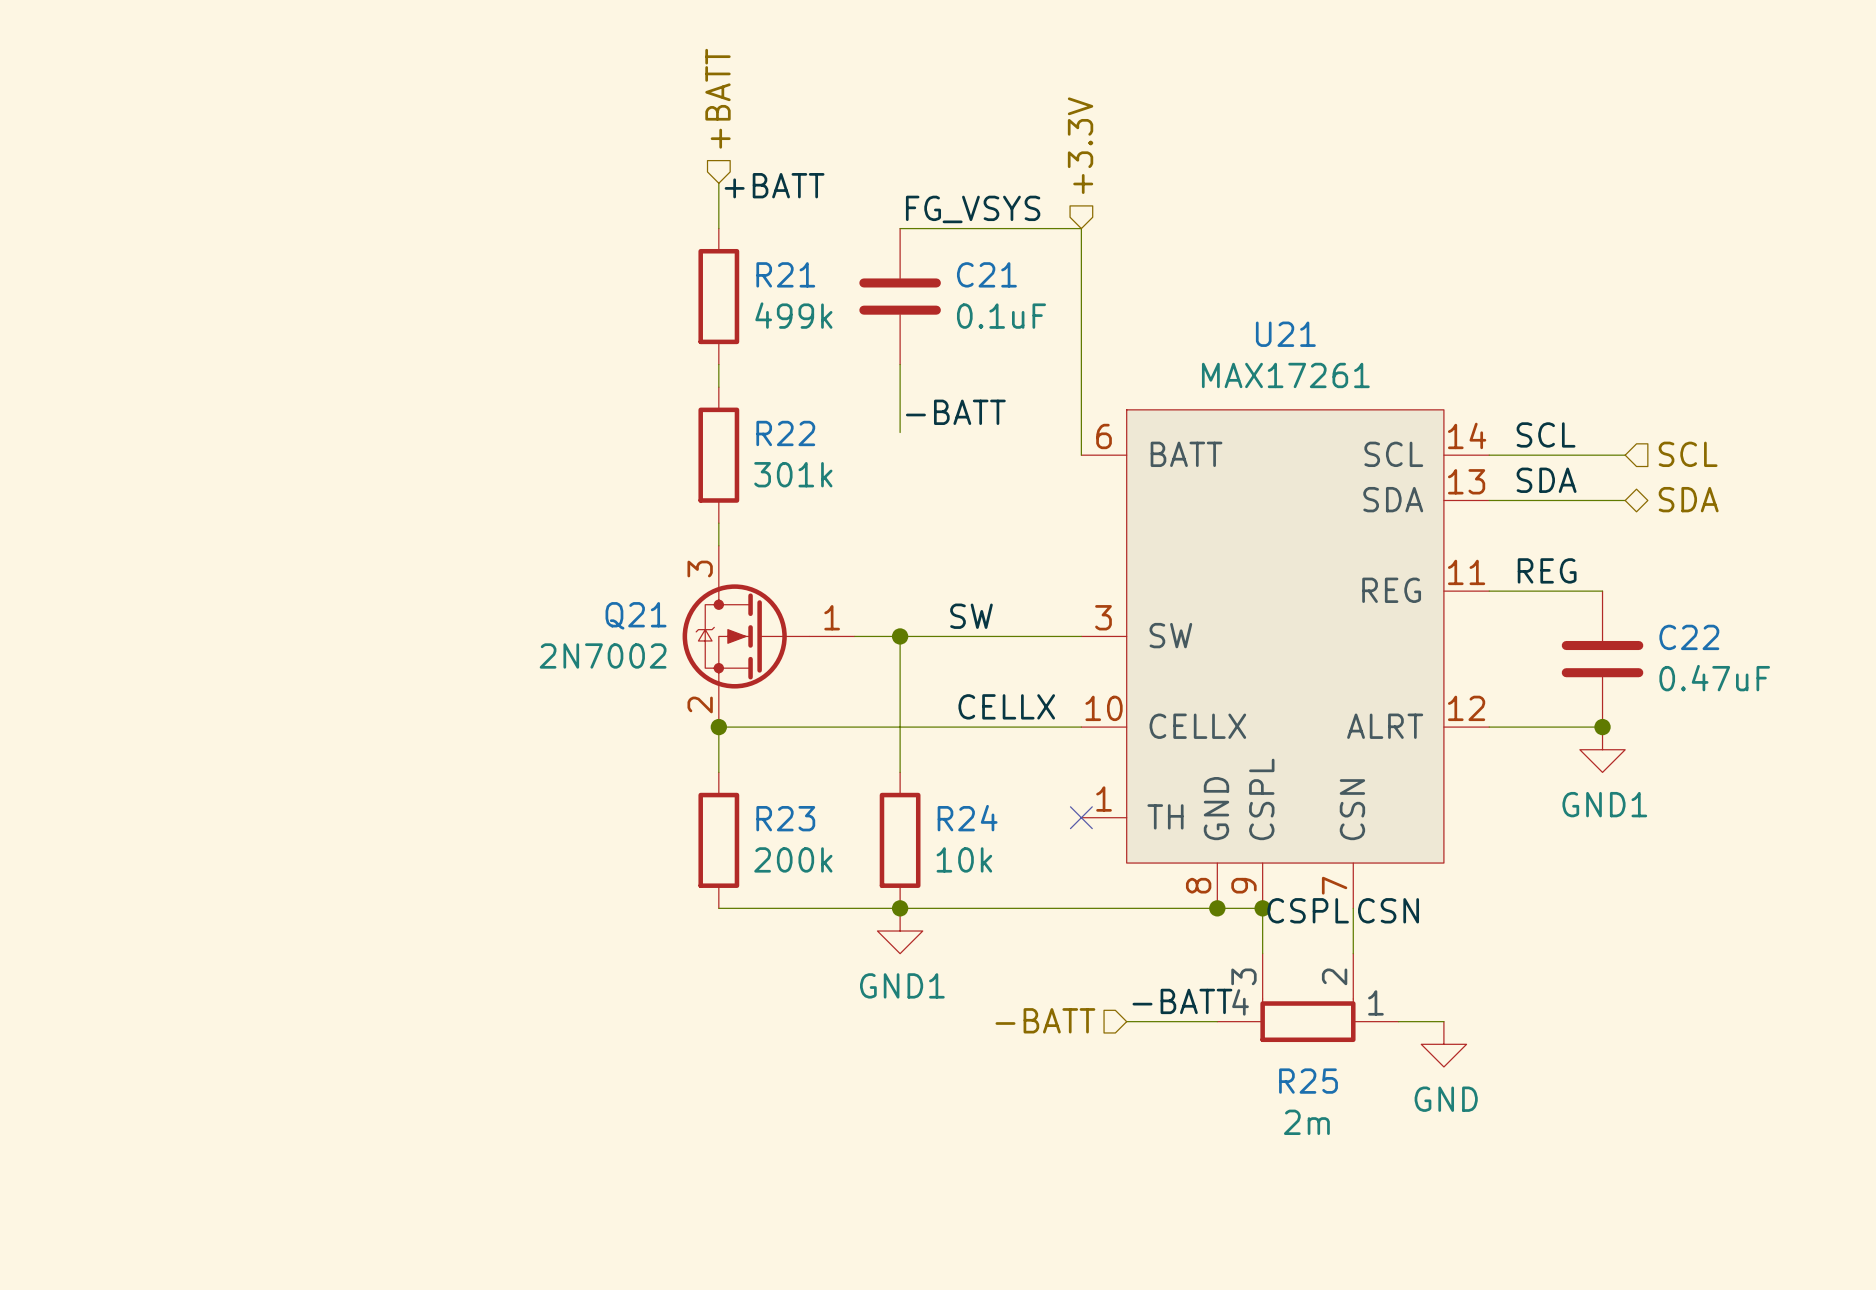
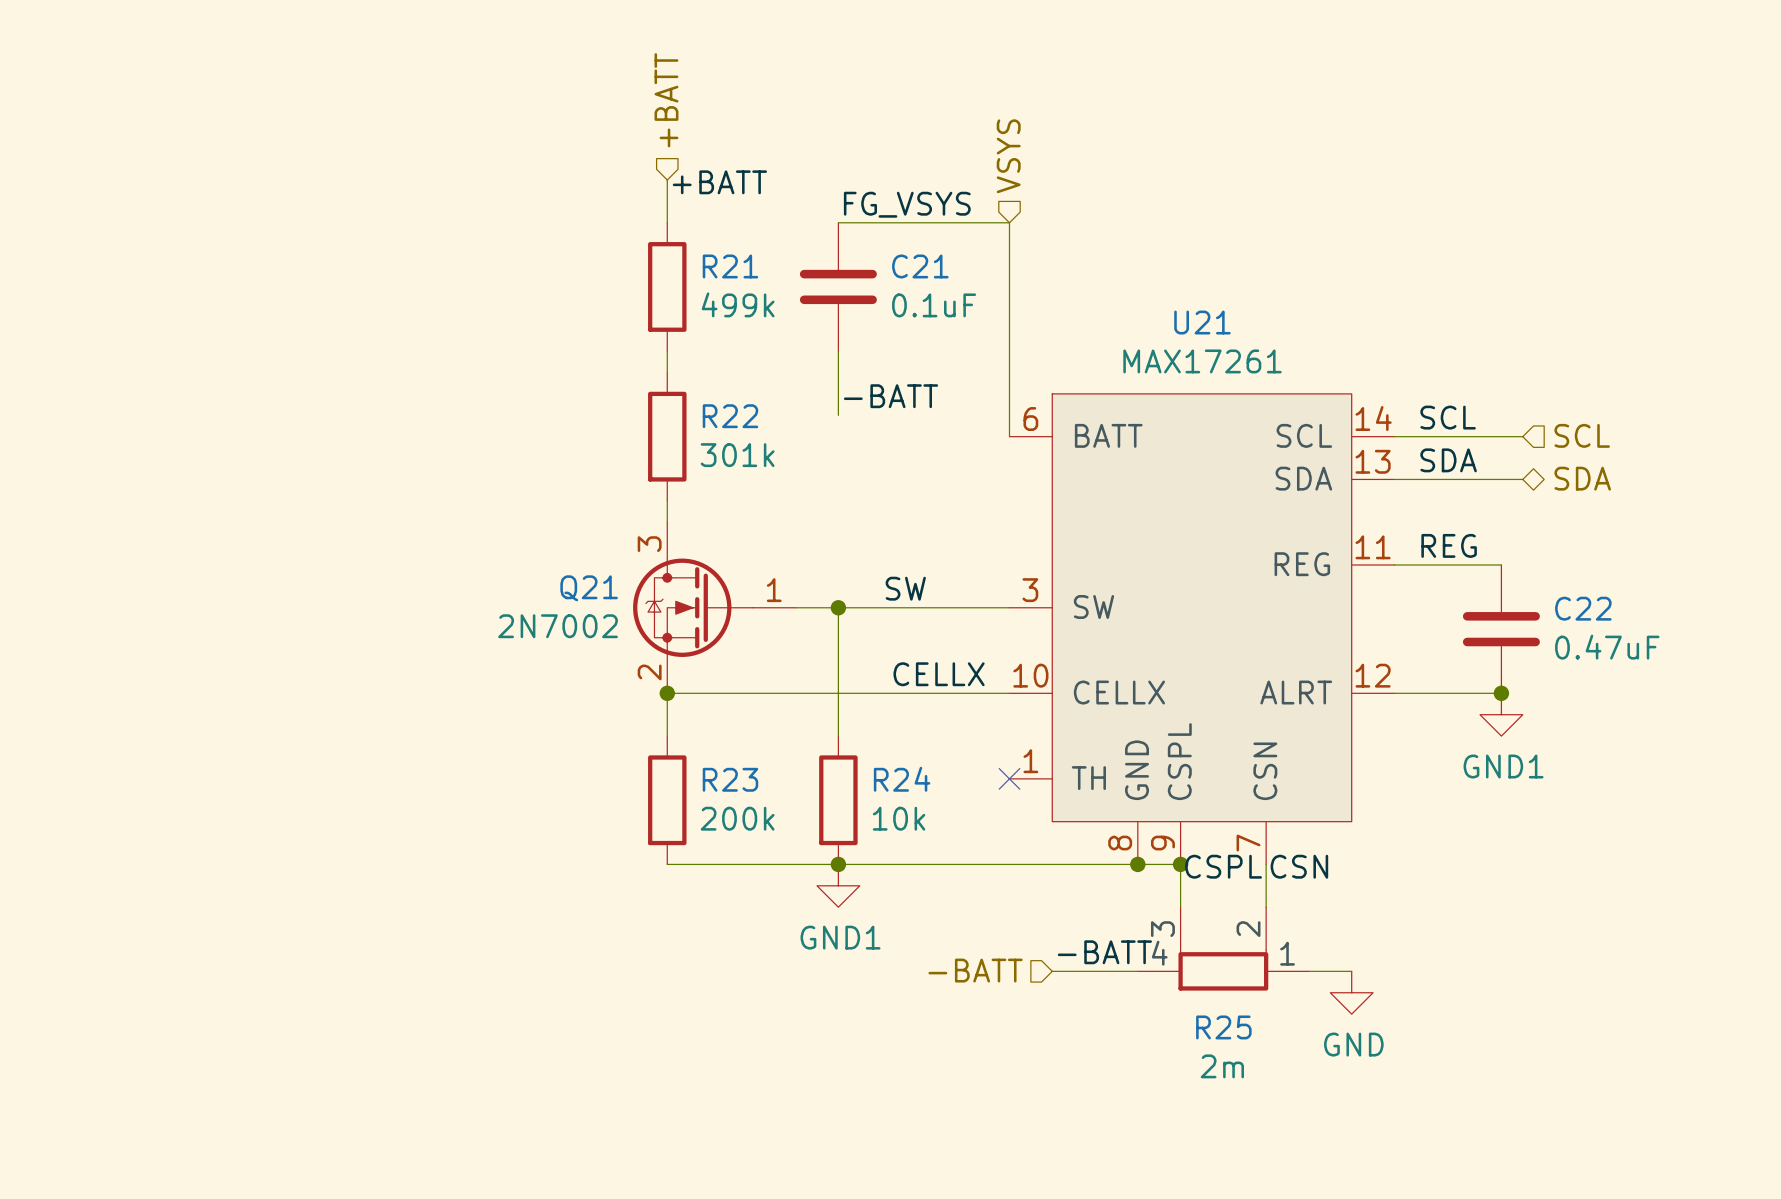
hierarchical label: +3.3V (1080, 145) -> VSYS (1008, 156)

